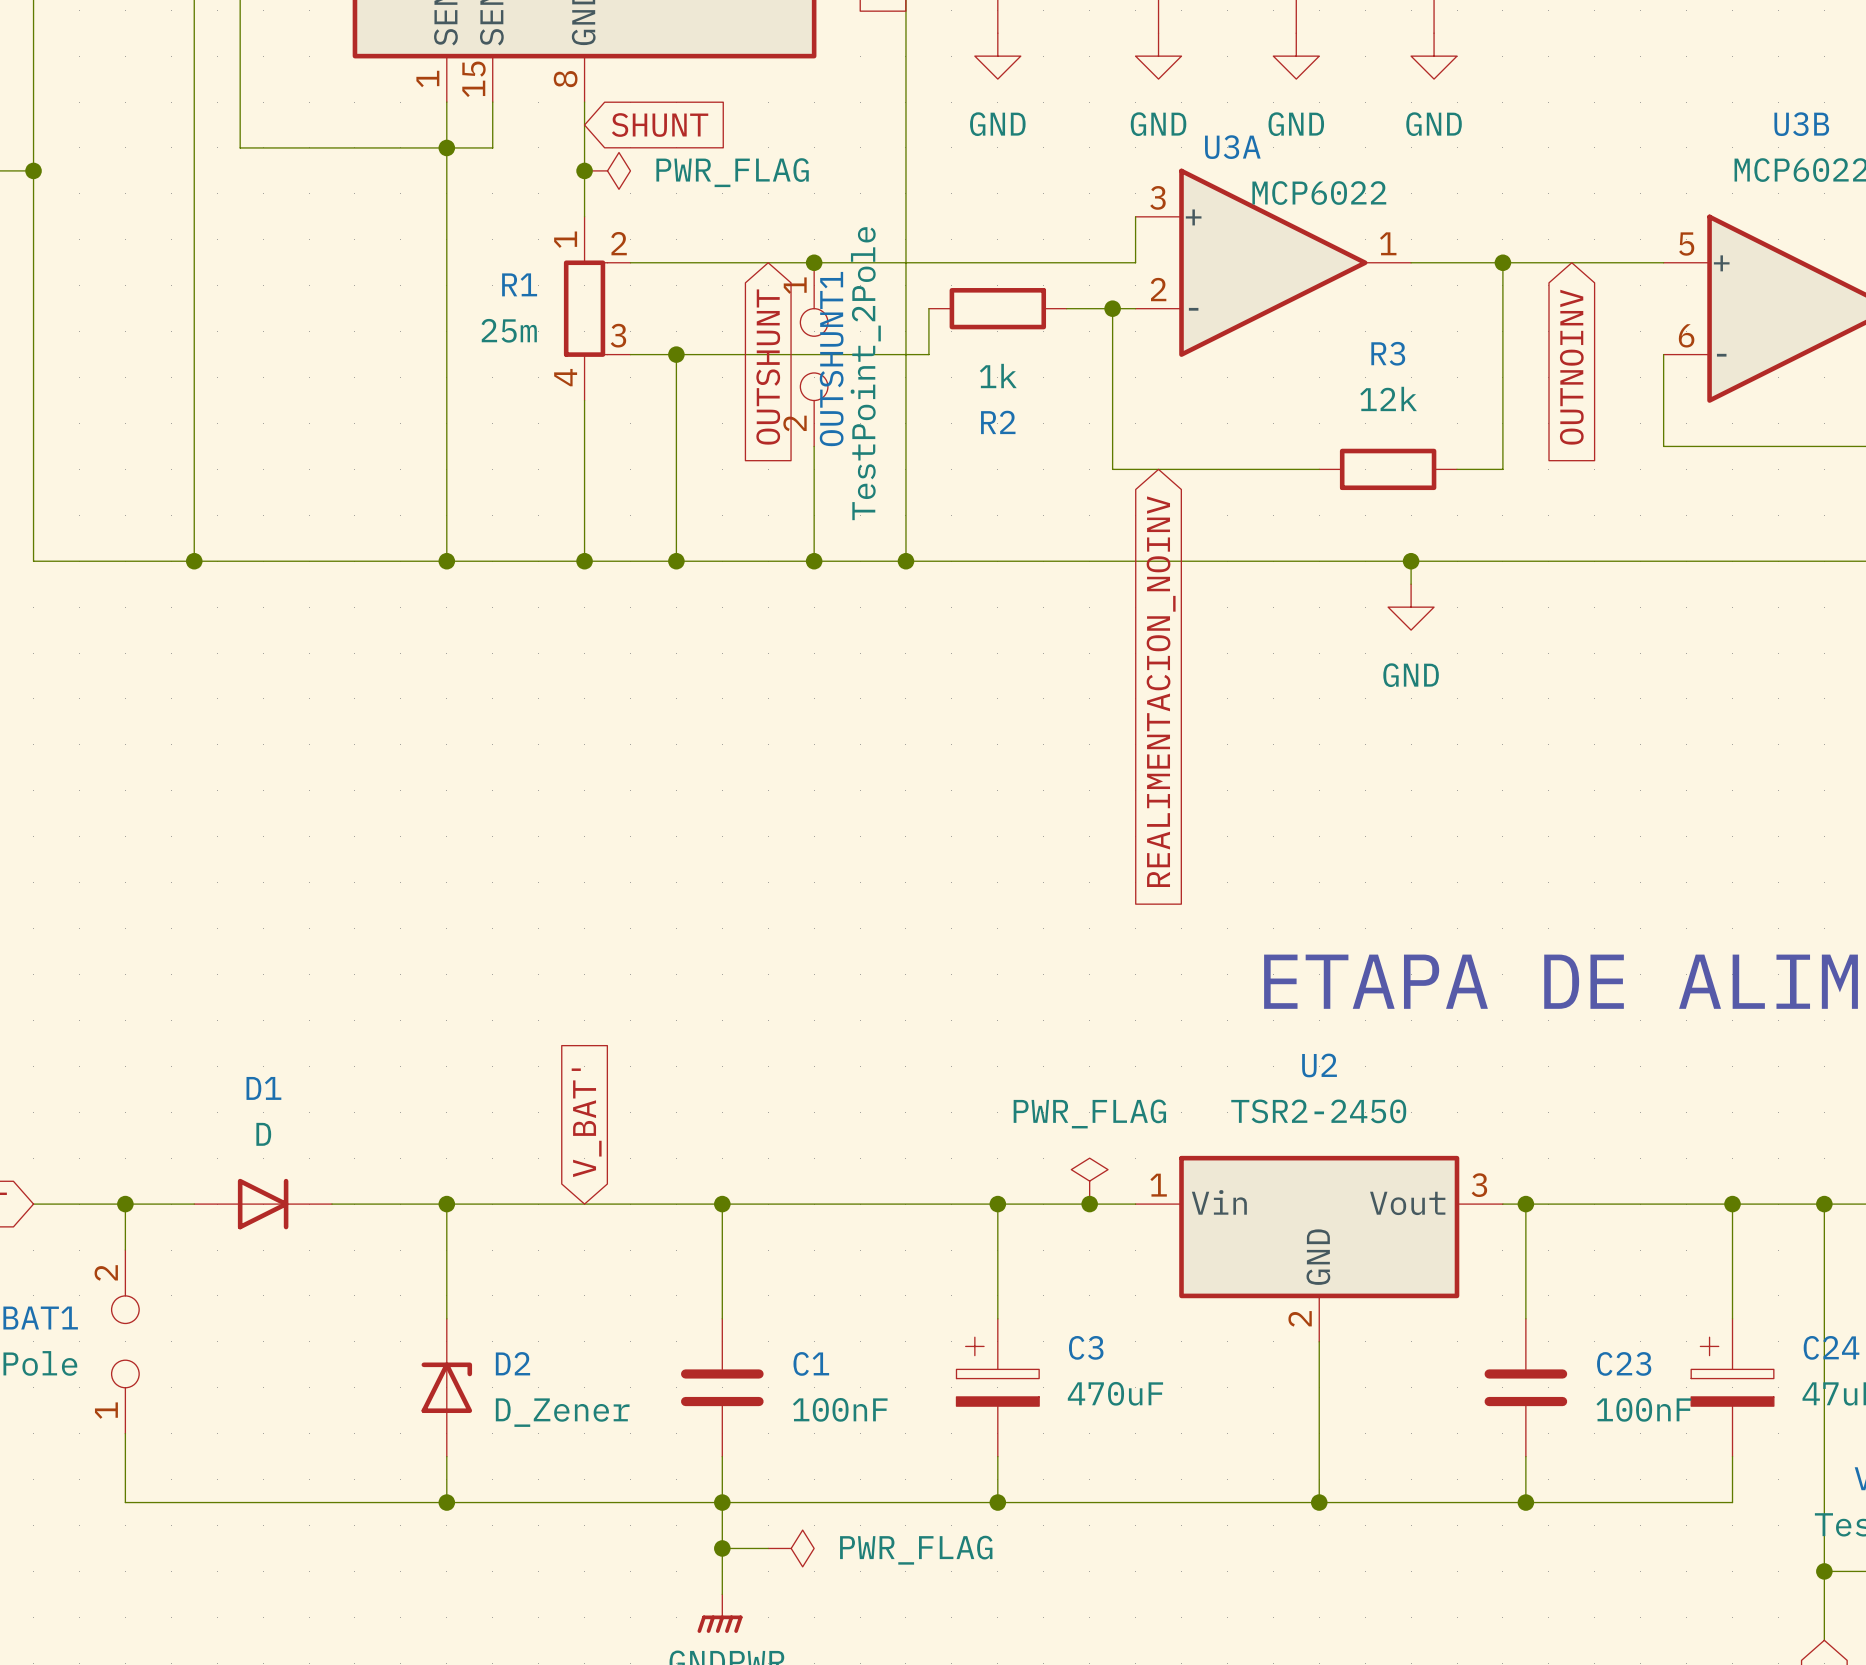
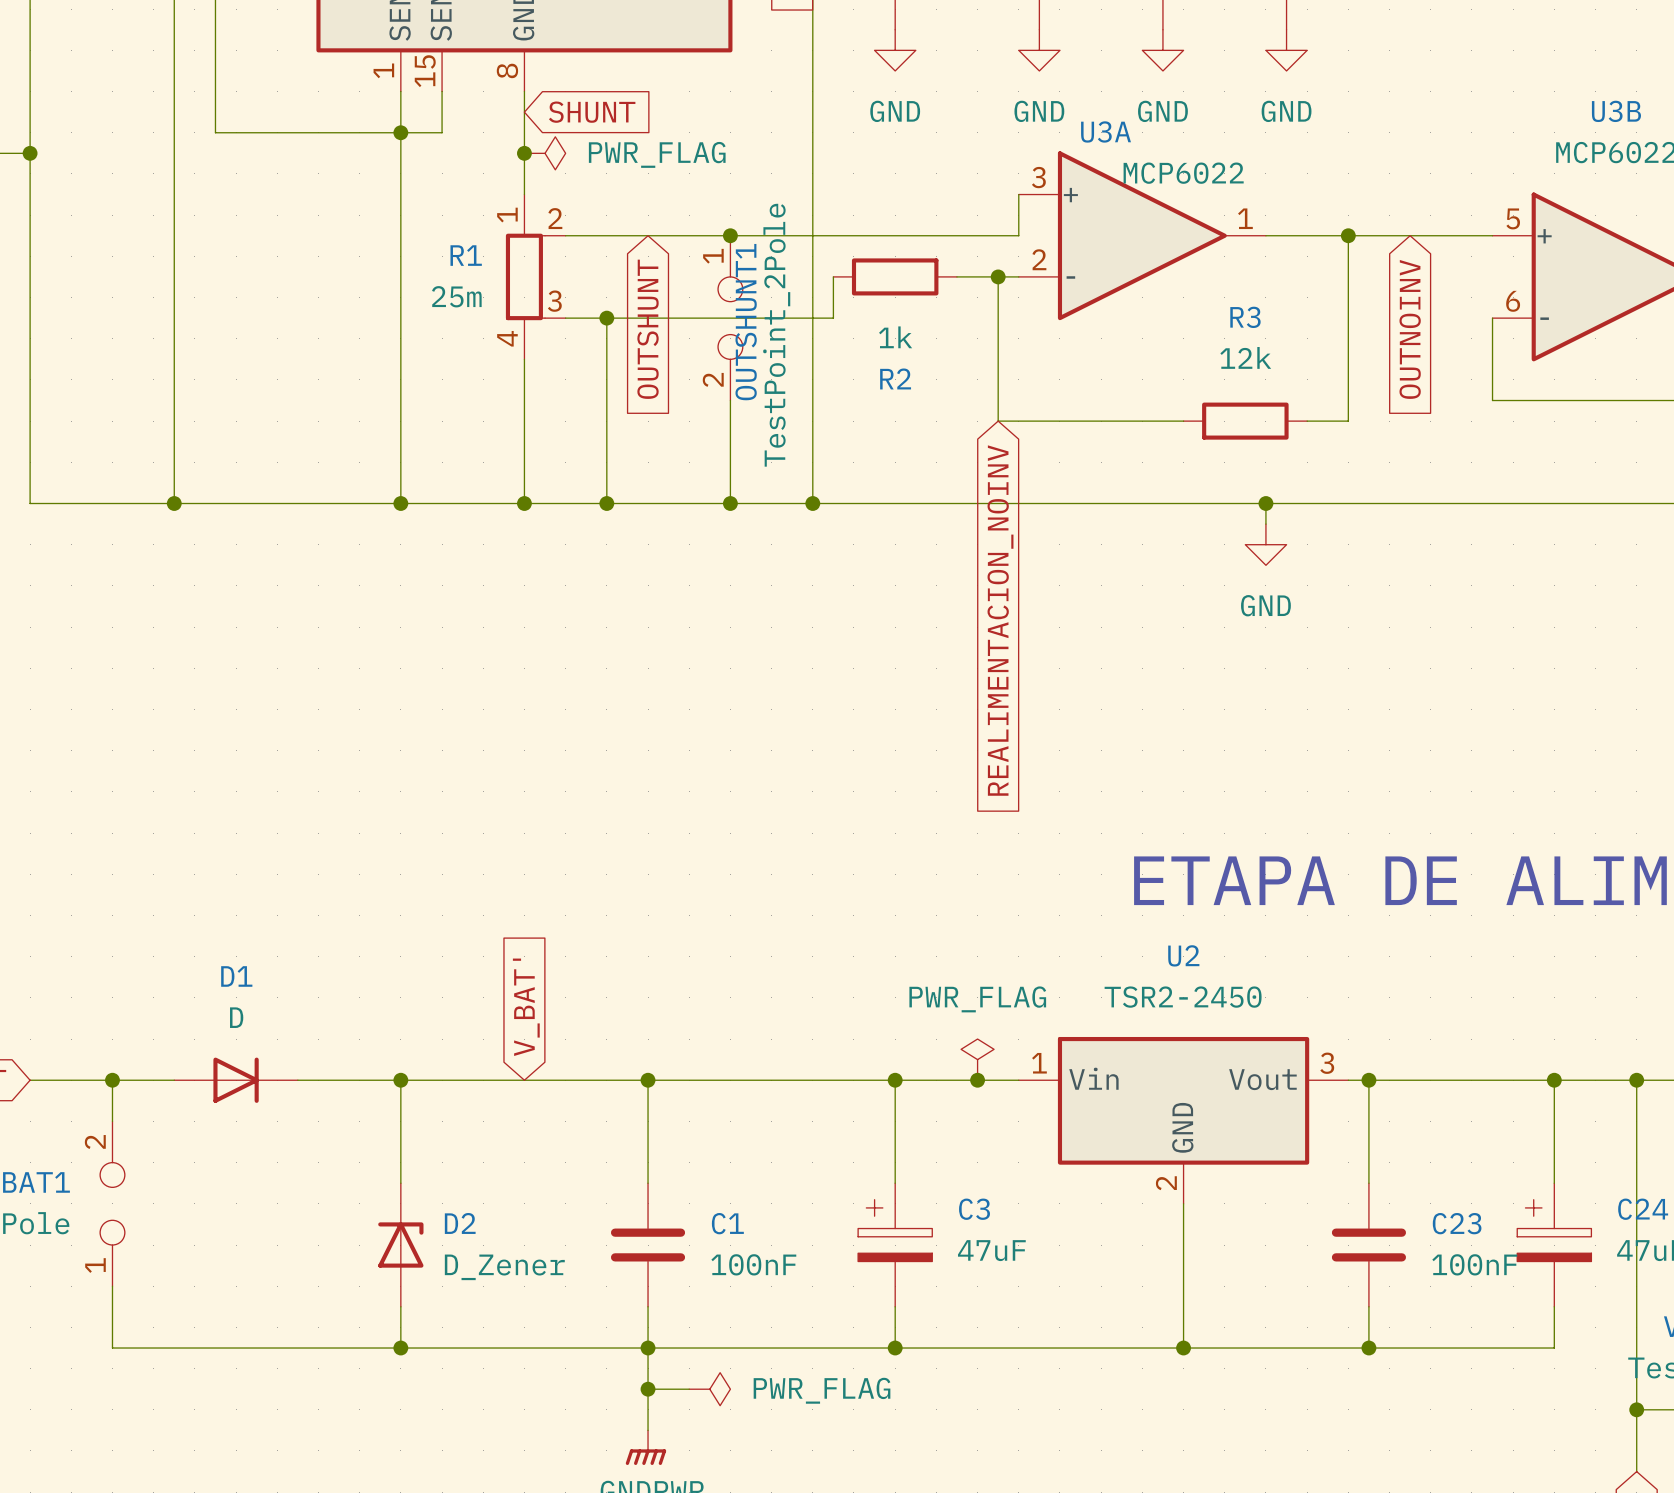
global label position: OUTSHUNT (768, 367) -> OUTSHUNT (648, 329)
global label position: REALIMENTACION_NOINV (1161, 691) -> REALIMENTACION_NOINV (1000, 620)
C3 value: 470uF (1115, 1393) -> 47uF (991, 1250)

